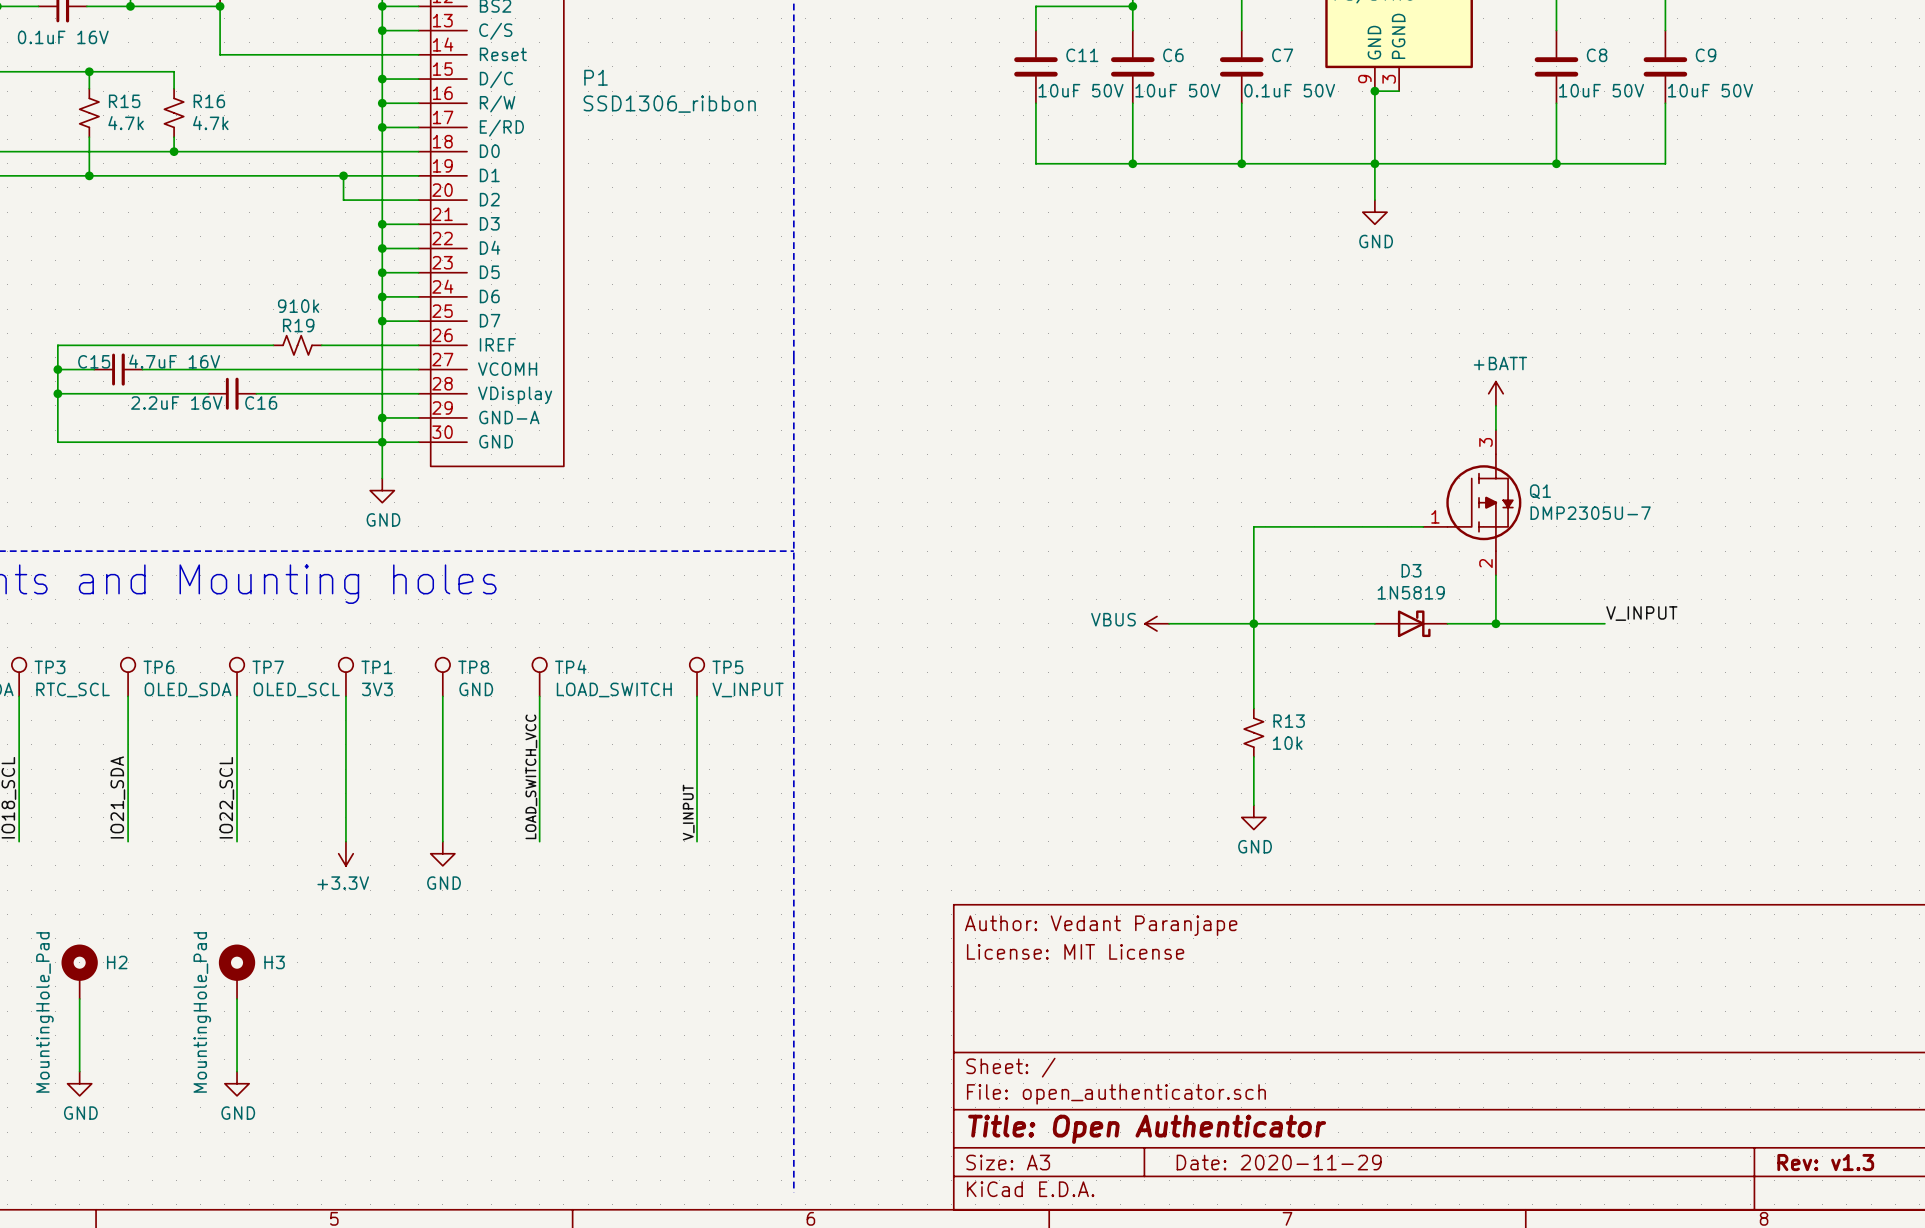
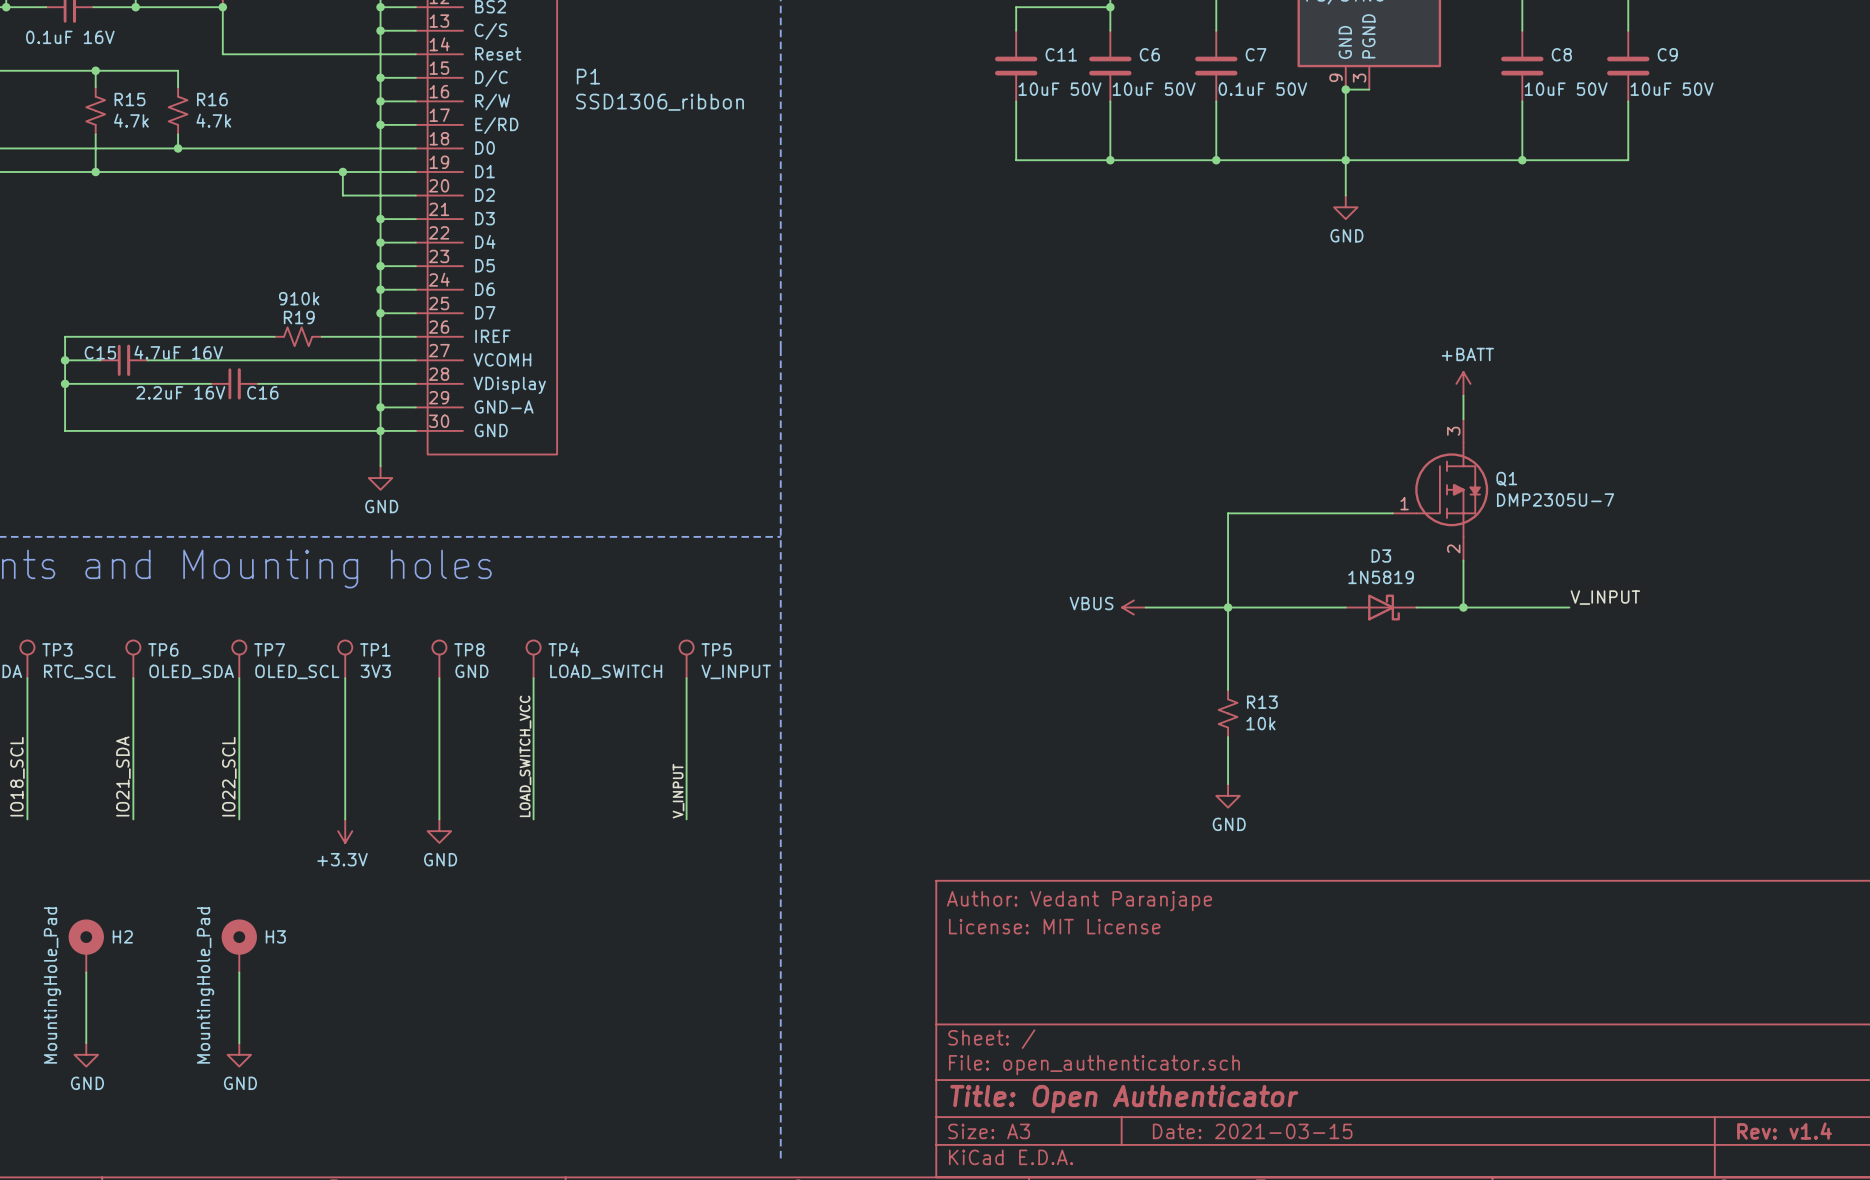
title block: Date: 2020-11-29 (1279, 1162) -> Date: 2021-03-15 (1252, 1131)
title block: Rev: v1.3 (1825, 1162) -> Rev: v1.4 (1784, 1131)

